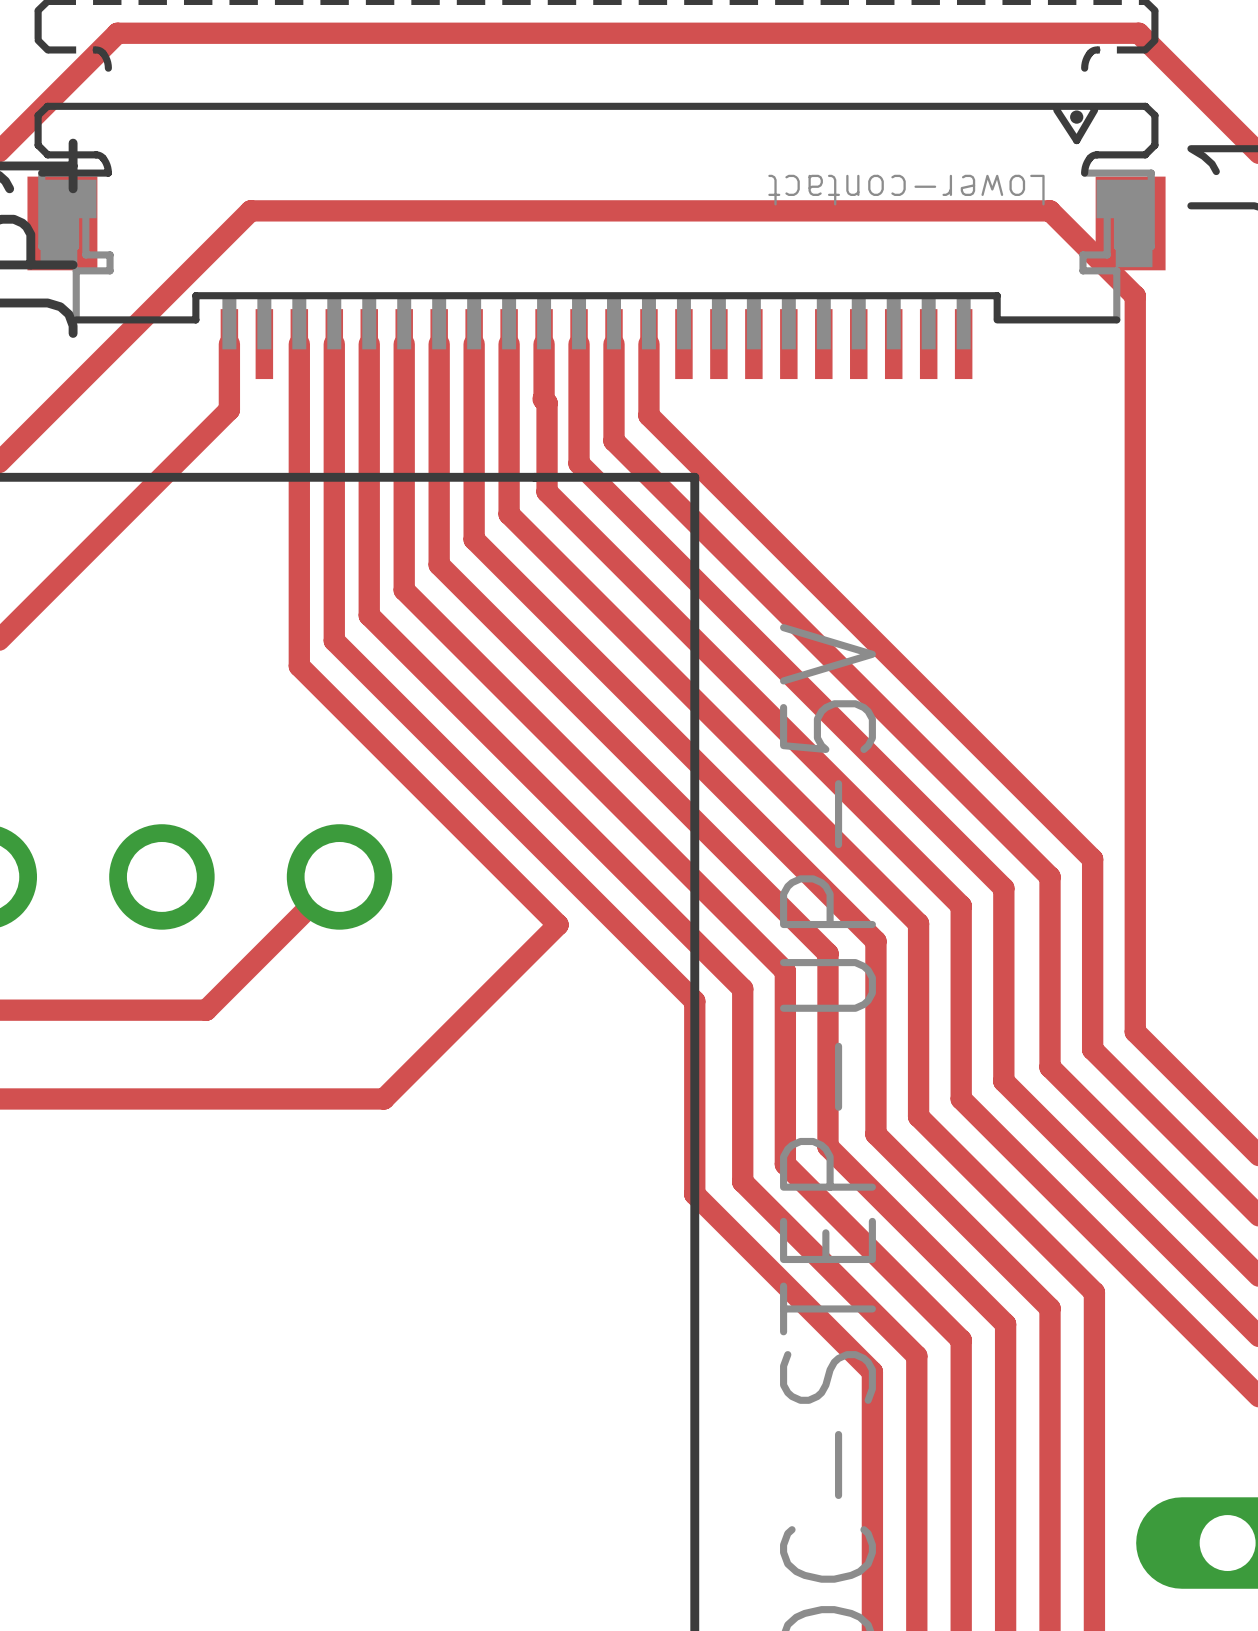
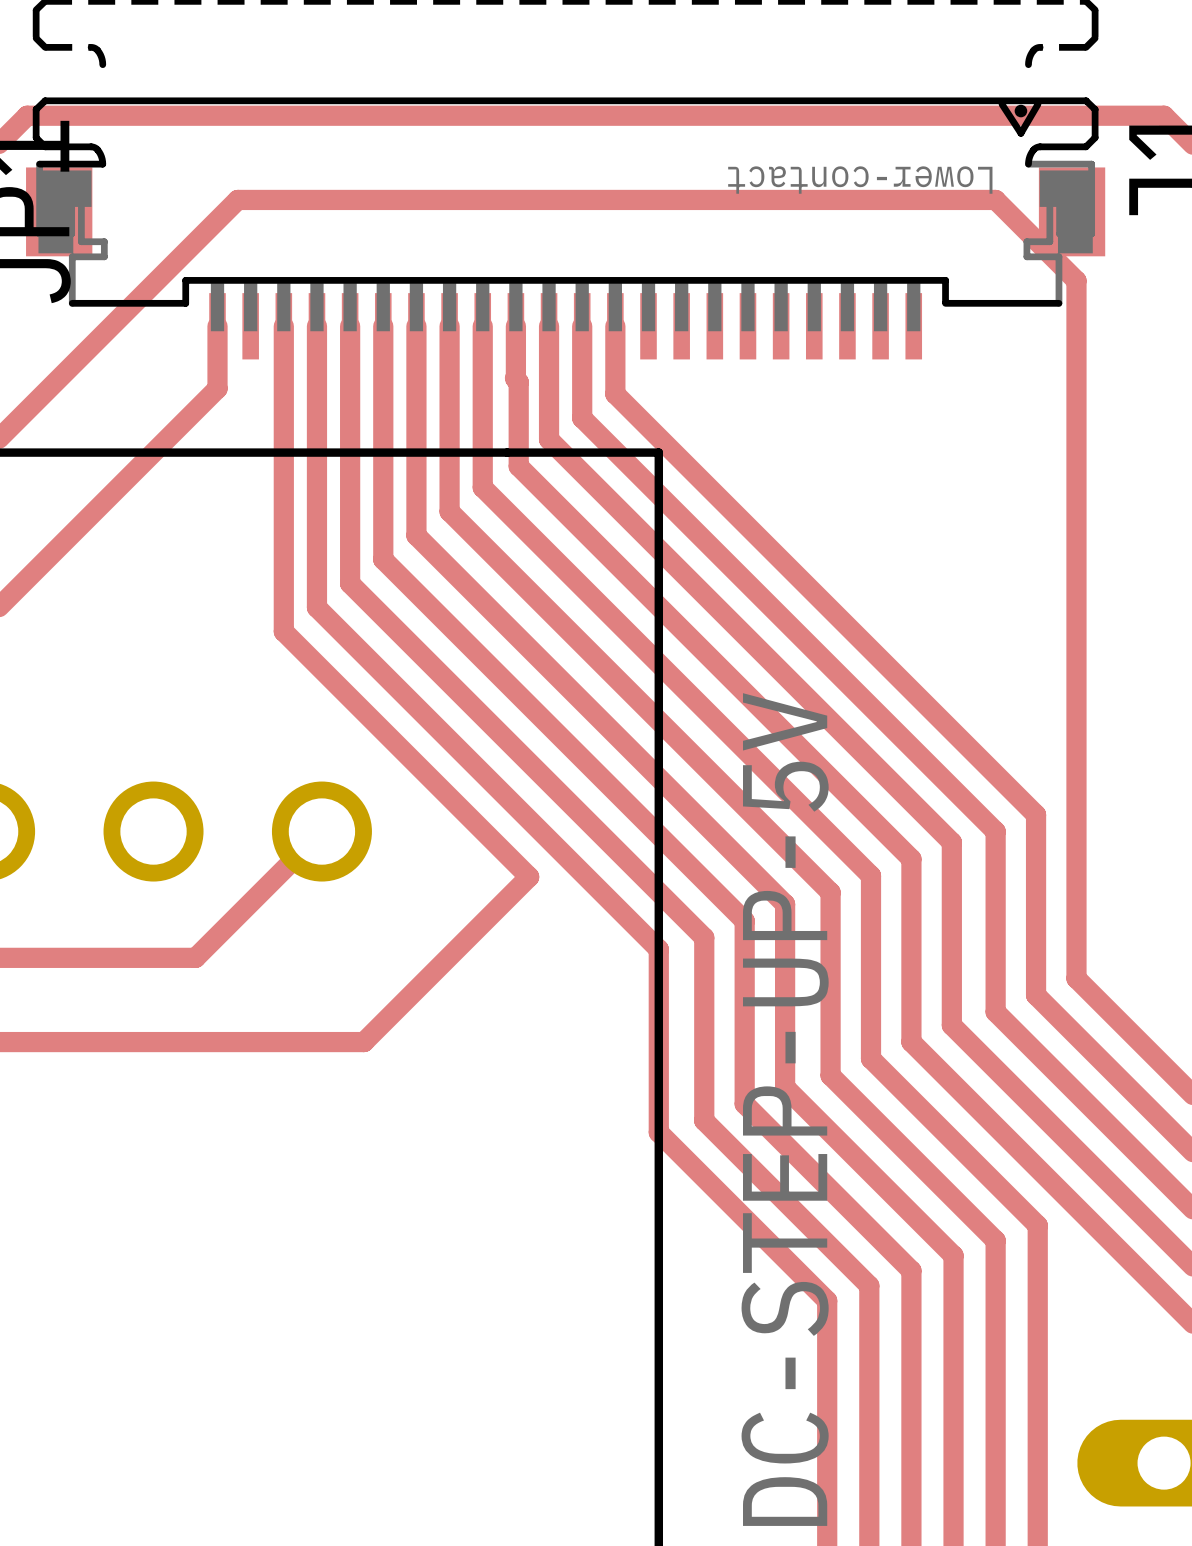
track: (28, 122) (117, 33) (1138, 33) (1227, 122) -> (27, 115) (1164, 115)

